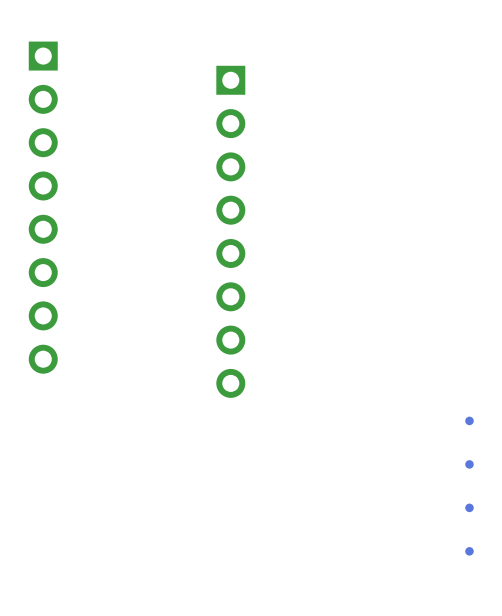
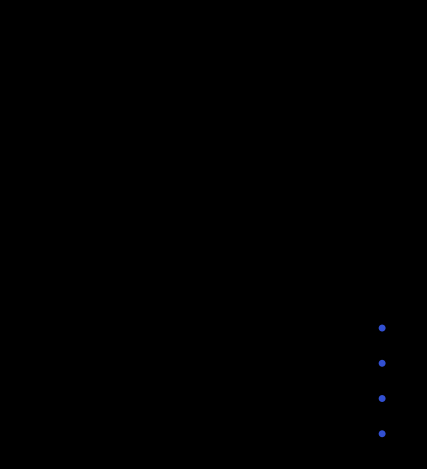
part: (43, 207) -> none
part: (230, 231) -> none

